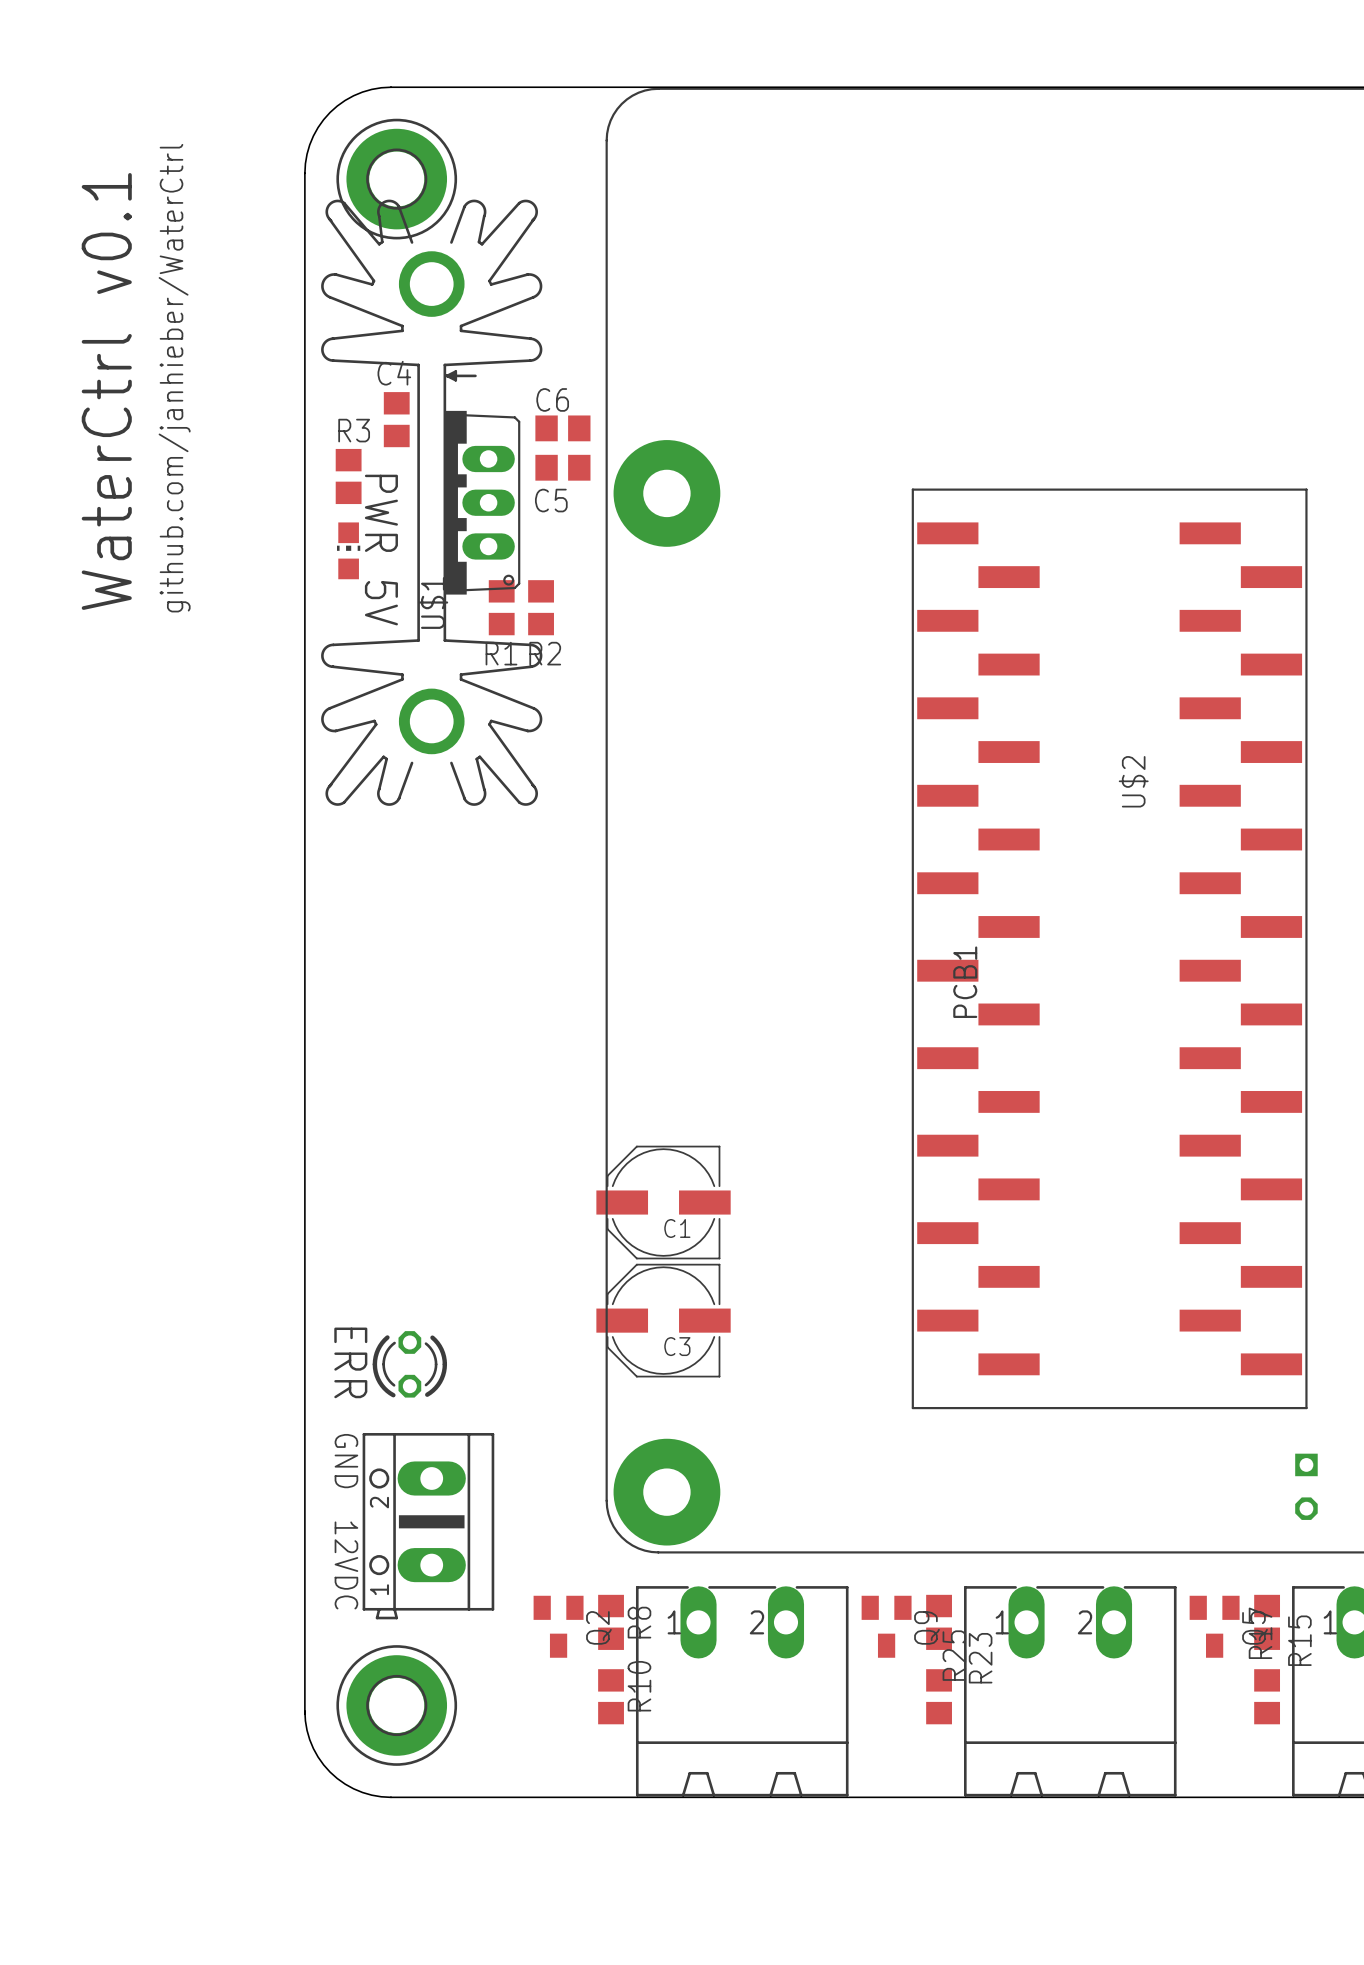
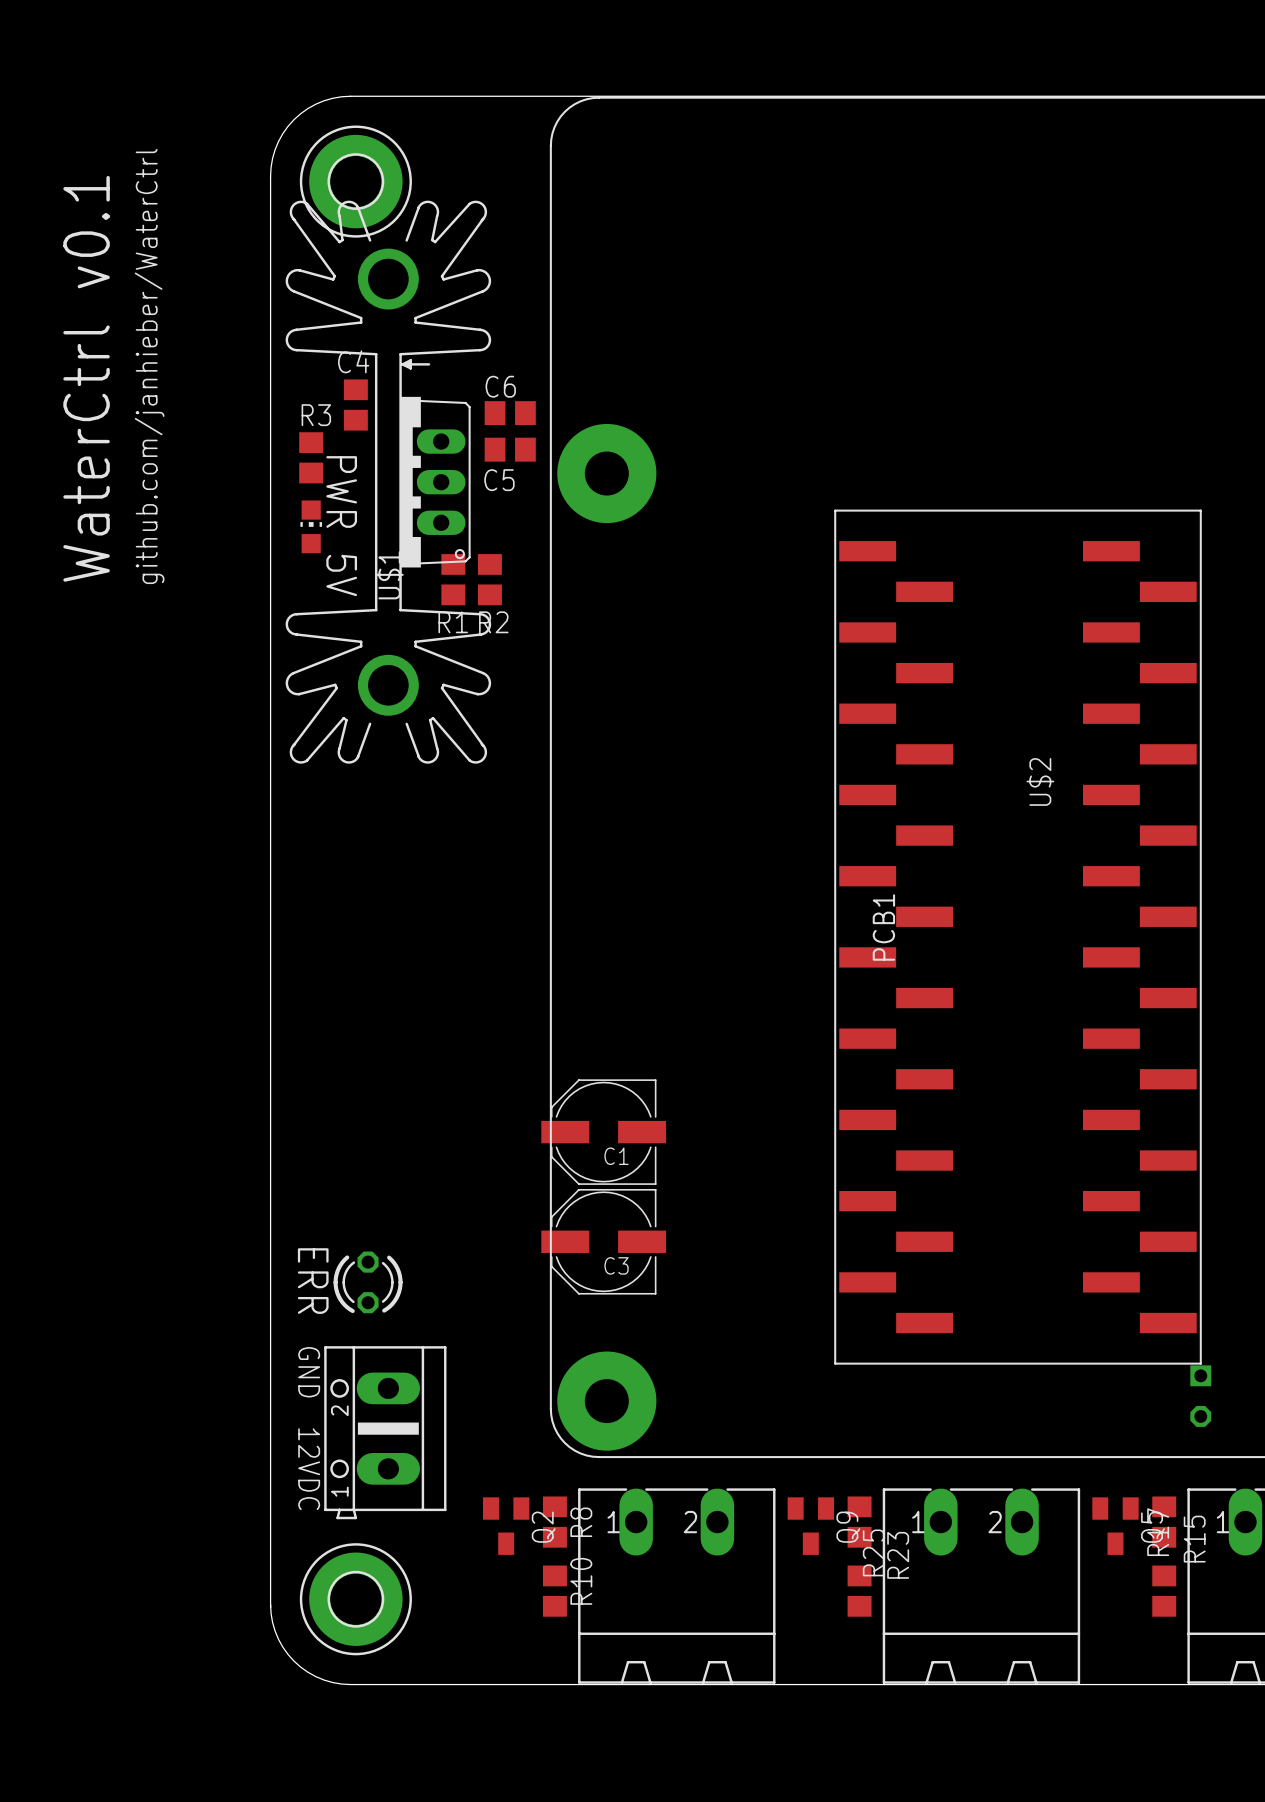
U$2 position: (1109, 948) -> (1018, 937)

